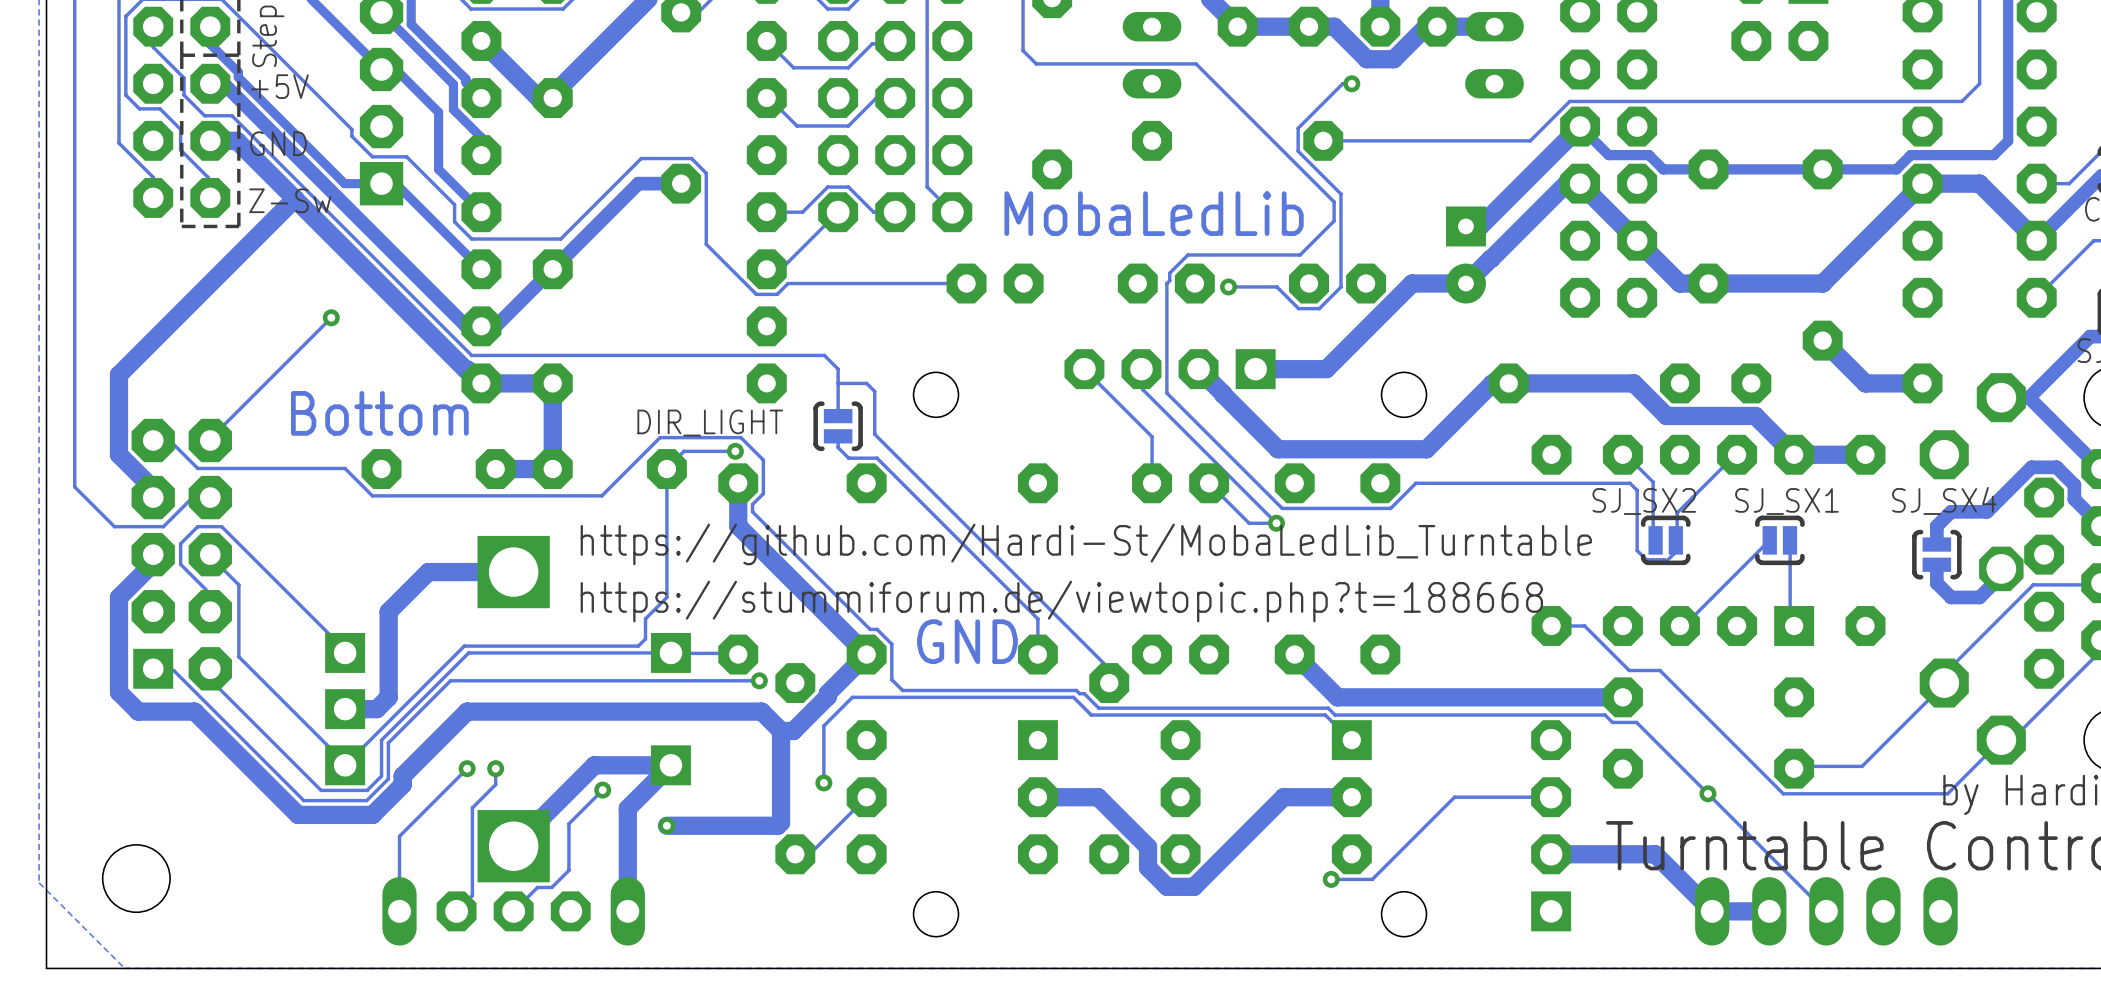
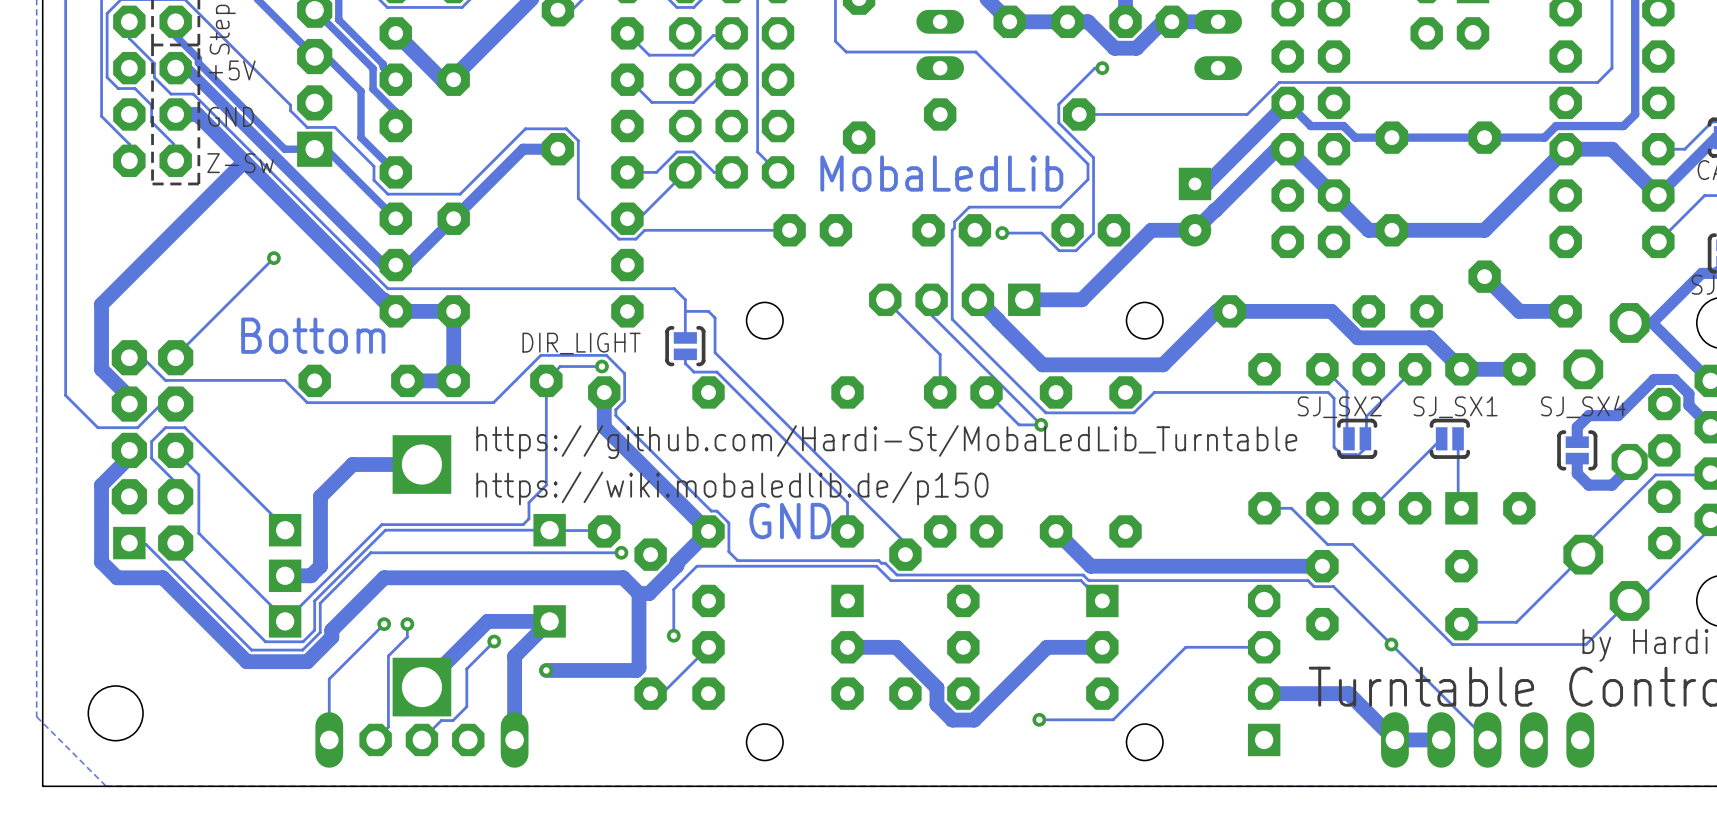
text: https://stummiforum.de/viewtopic.php?t=188668 (1061, 601) -> https://wiki.mobaledlib.de/p150 (732, 488)
via position: (1331, 879) -> (1039, 719)
track: (1372, 879) (1331, 879) -> (1119, 714) (1113, 719) (1039, 719)

